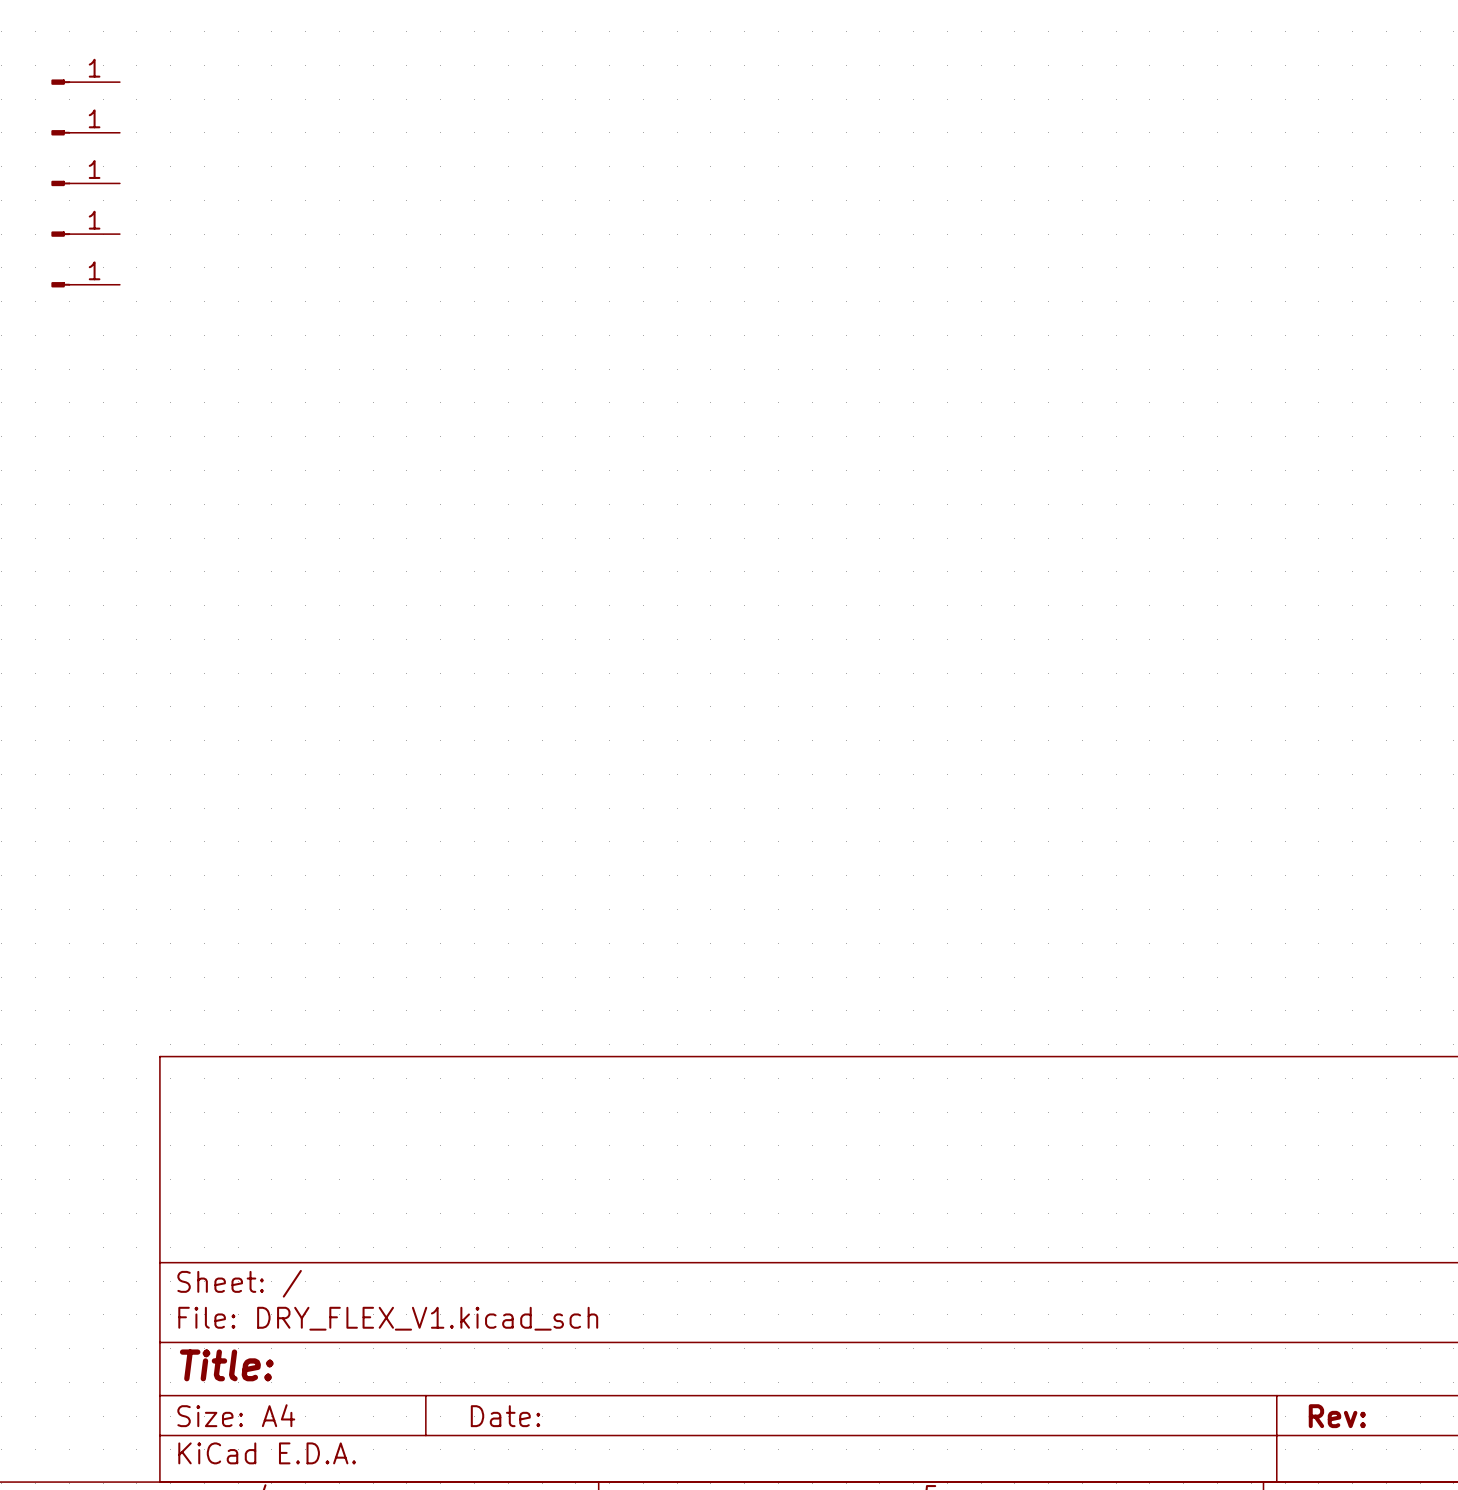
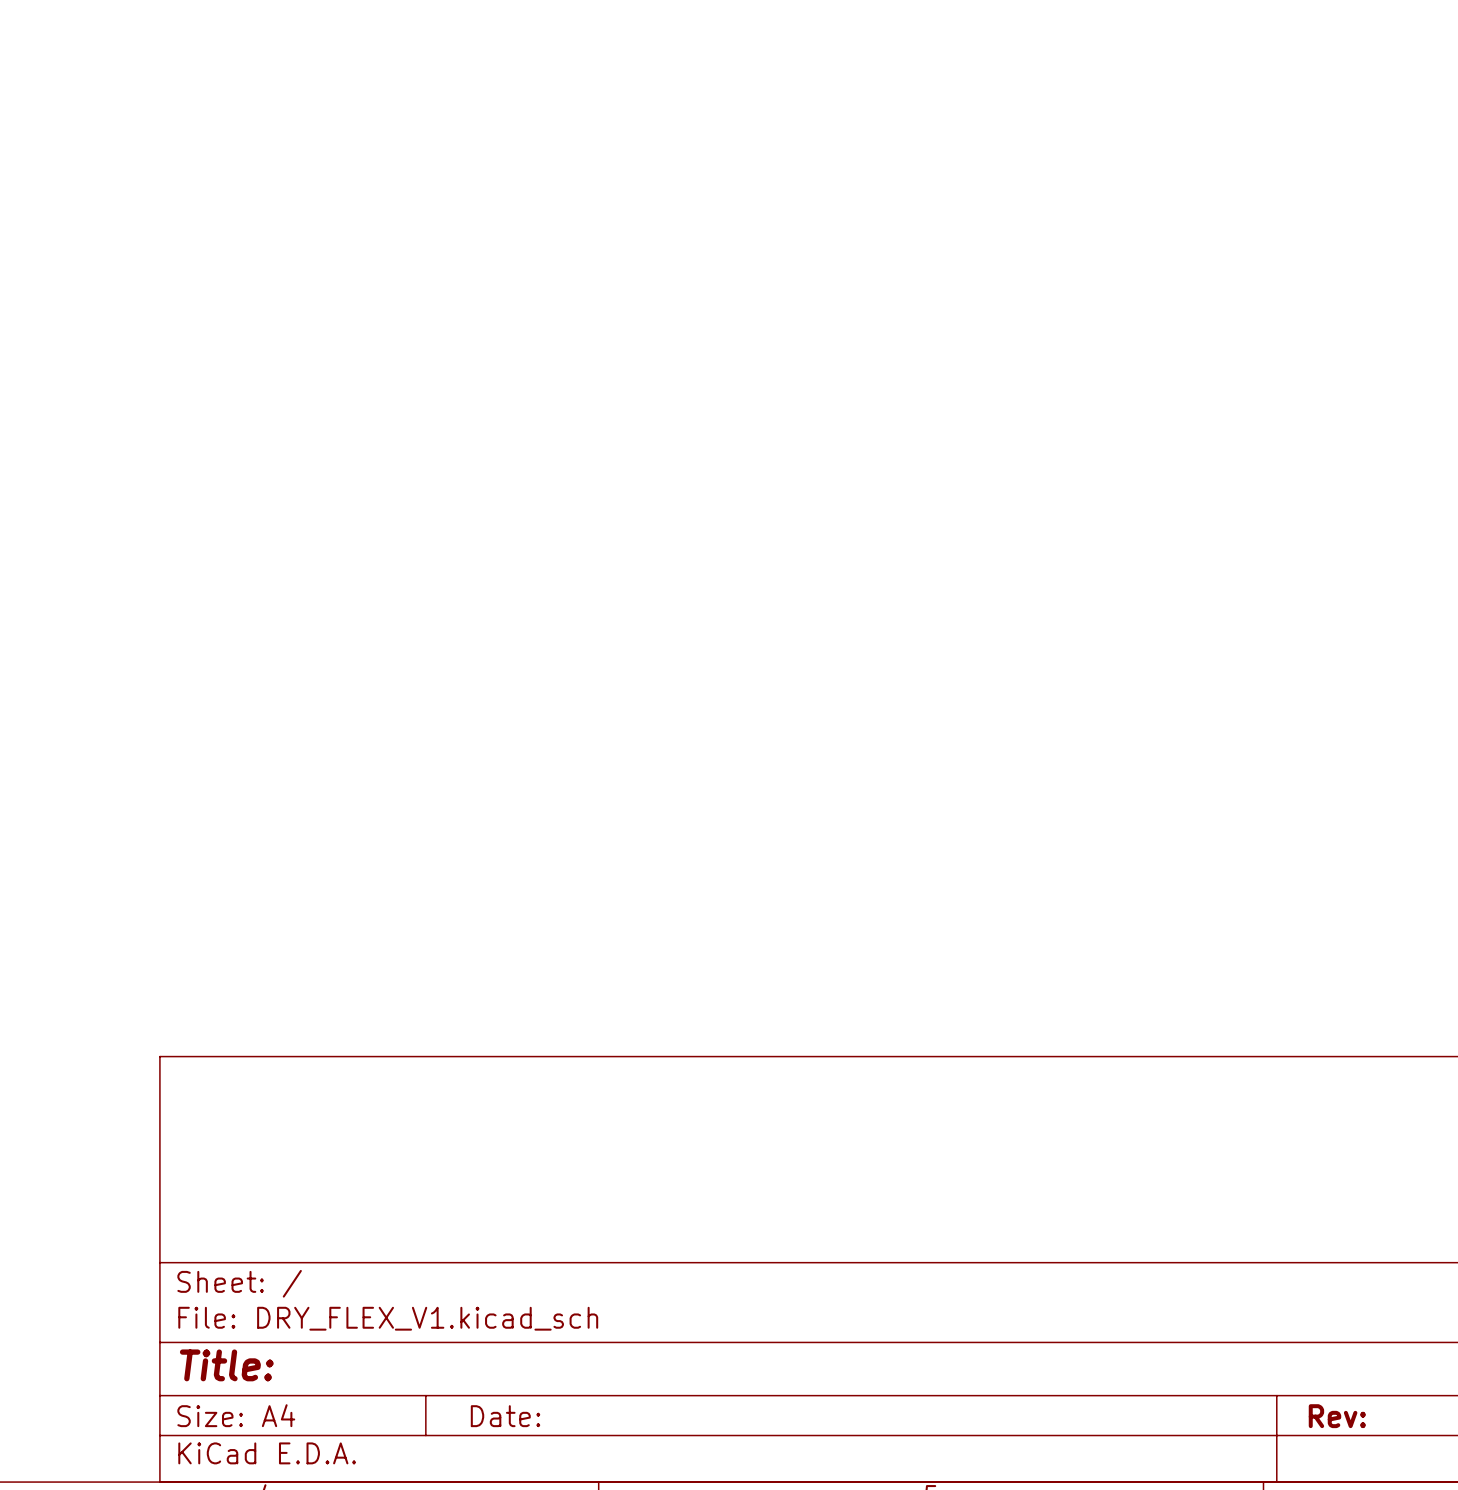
part: (85, 82) -> none
part: (85, 132) -> none
part: (85, 183) -> none
part: (85, 234) -> none
part: (85, 284) -> none

